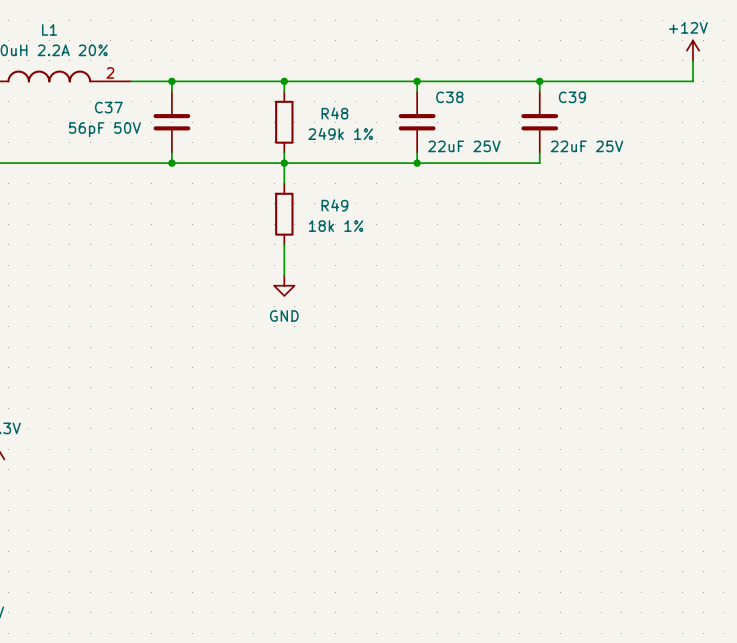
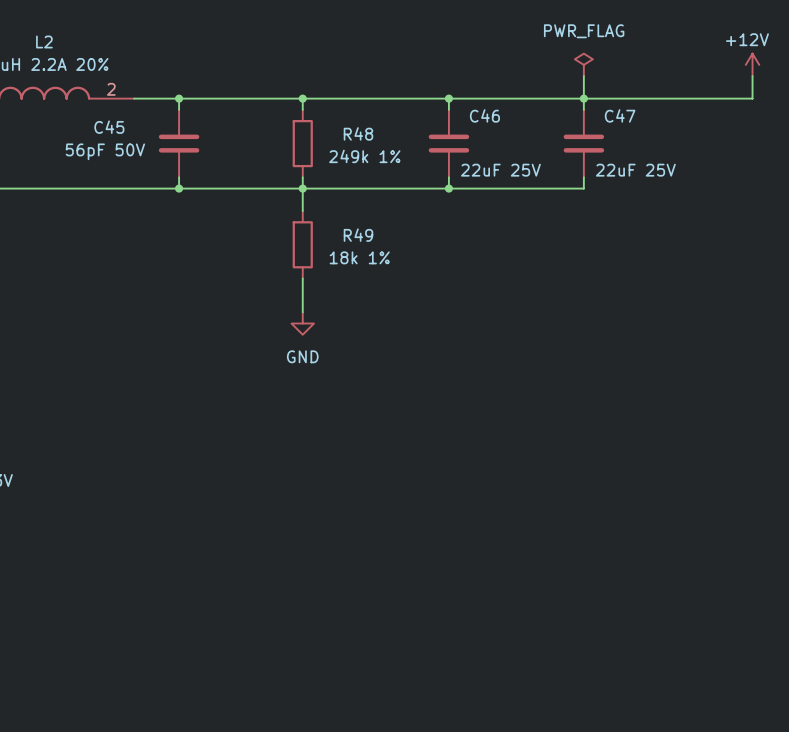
L1 name: L1 (49, 29) -> L2 (44, 41)
power symbol: none -> PWR_FLAG (583, 64)
wire: none -> (583, 76) (583, 98)
C38 name: C38 (449, 97) -> C46 (484, 115)
C39 name: C39 (572, 97) -> C47 (620, 115)
C37 name: C37 (108, 107) -> C45 (109, 127)

